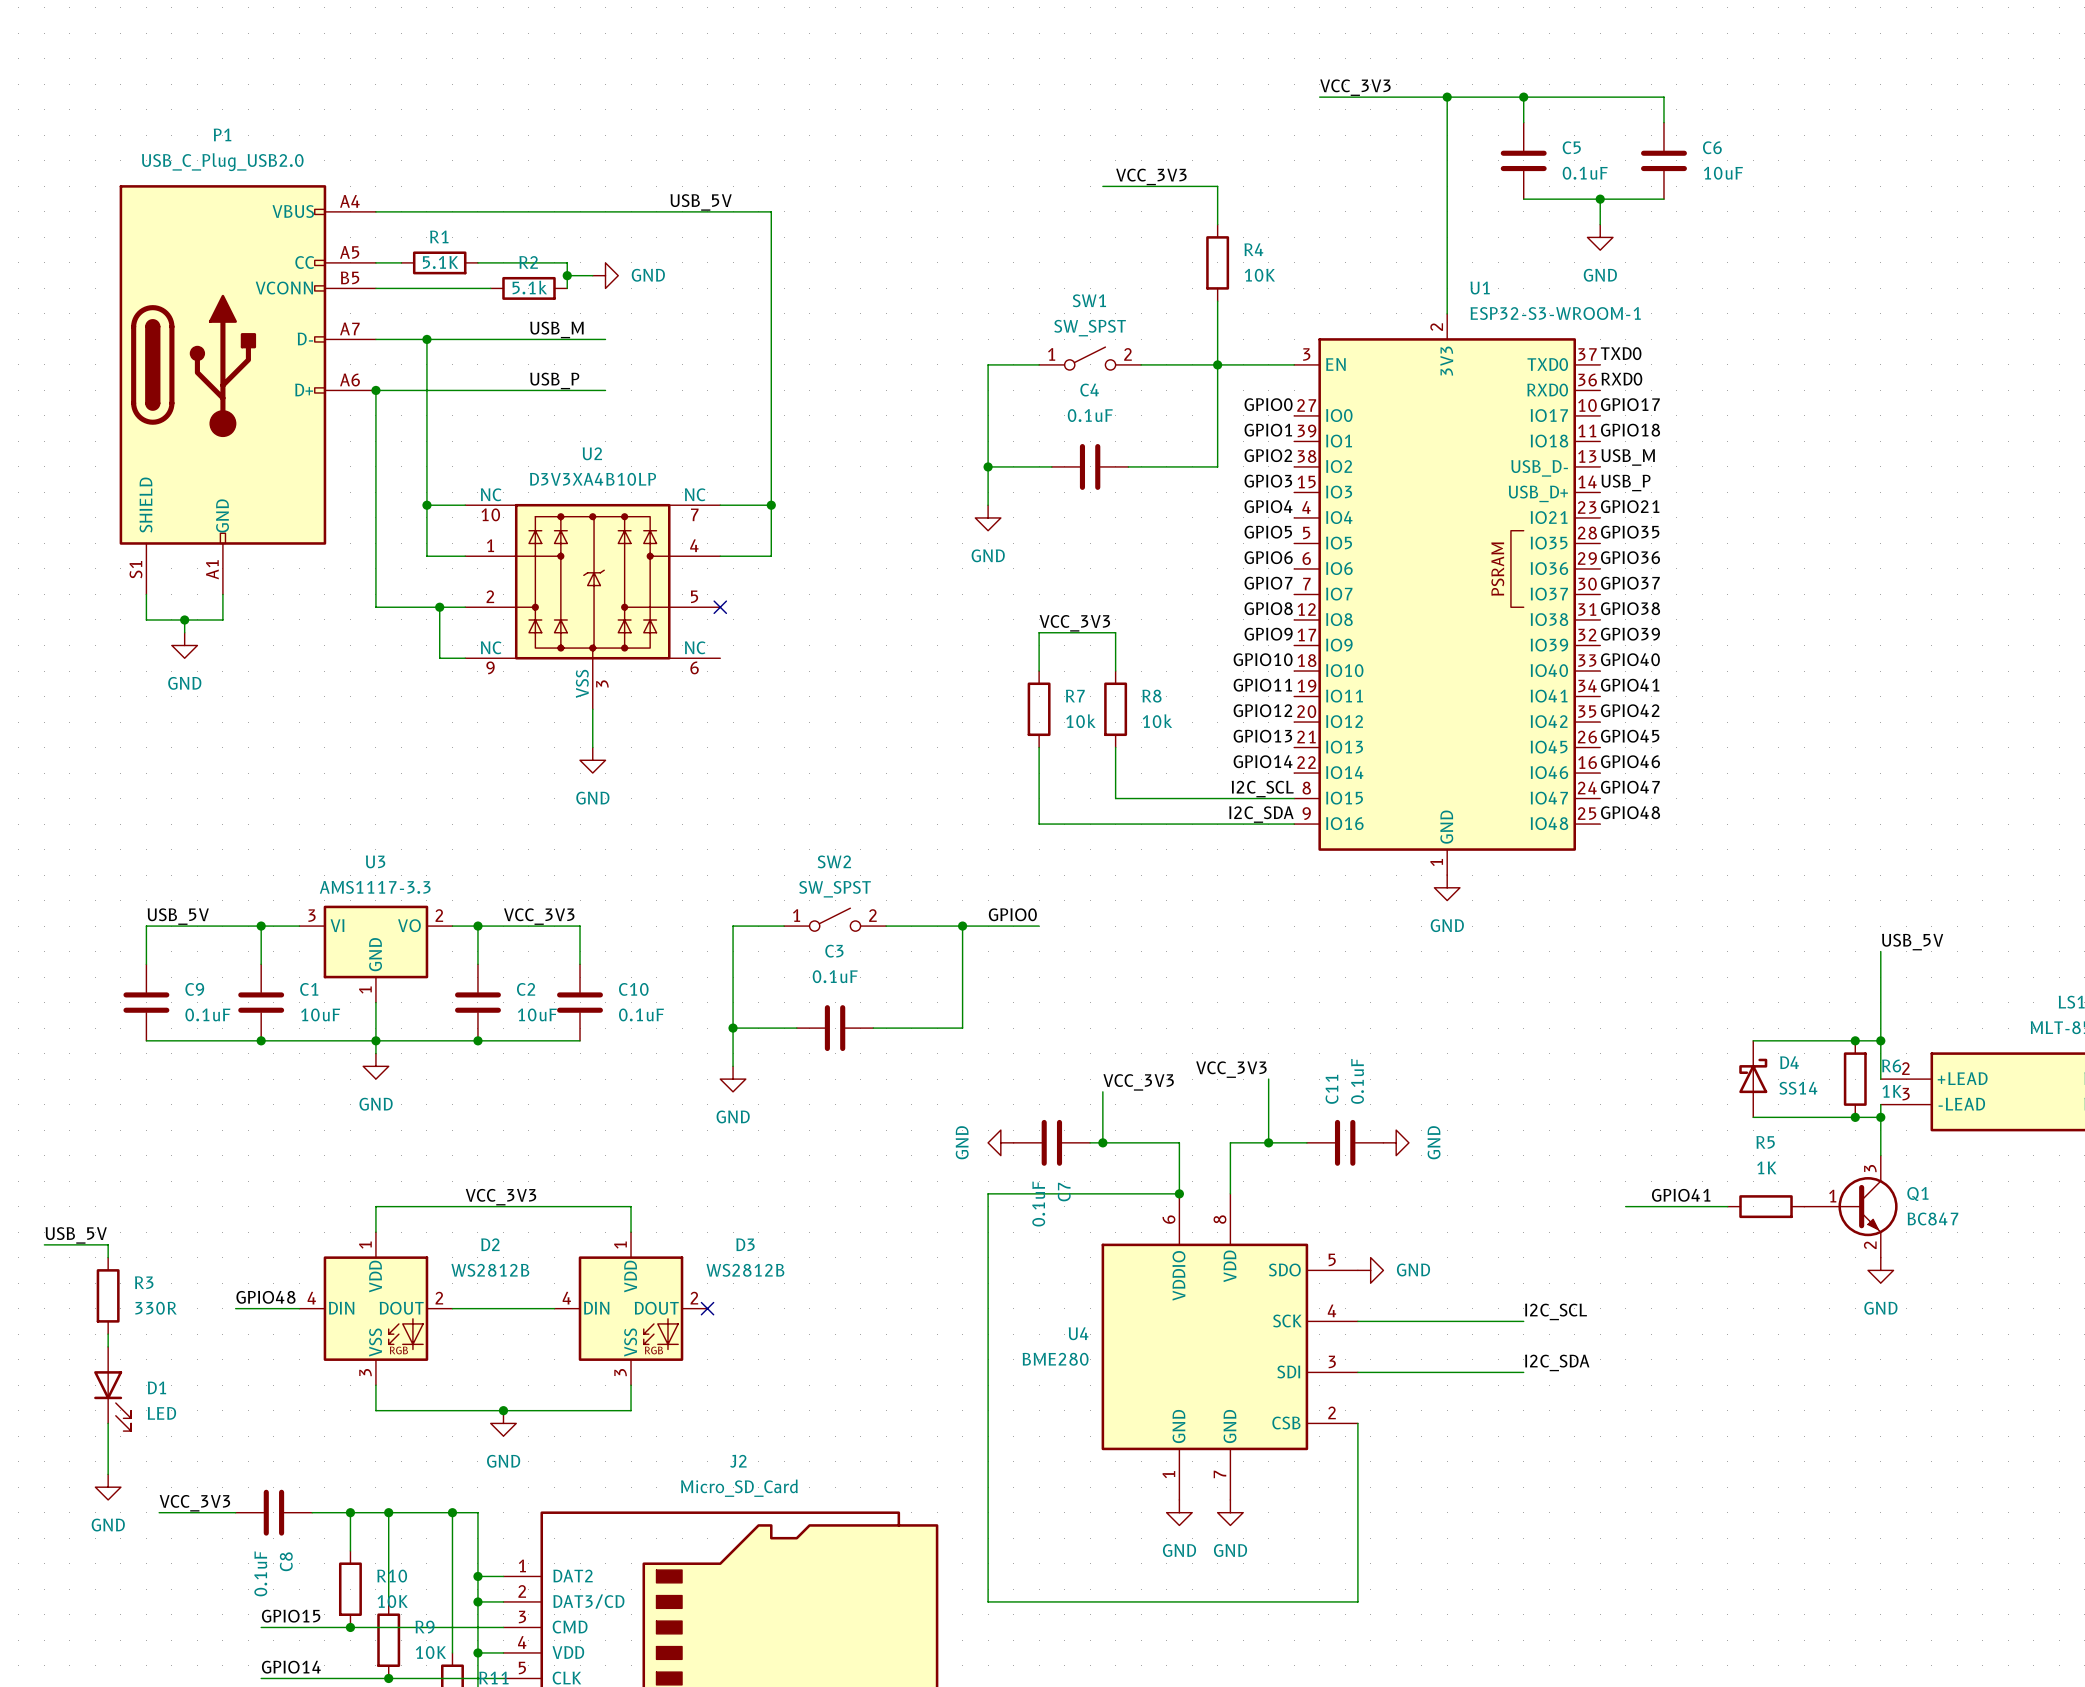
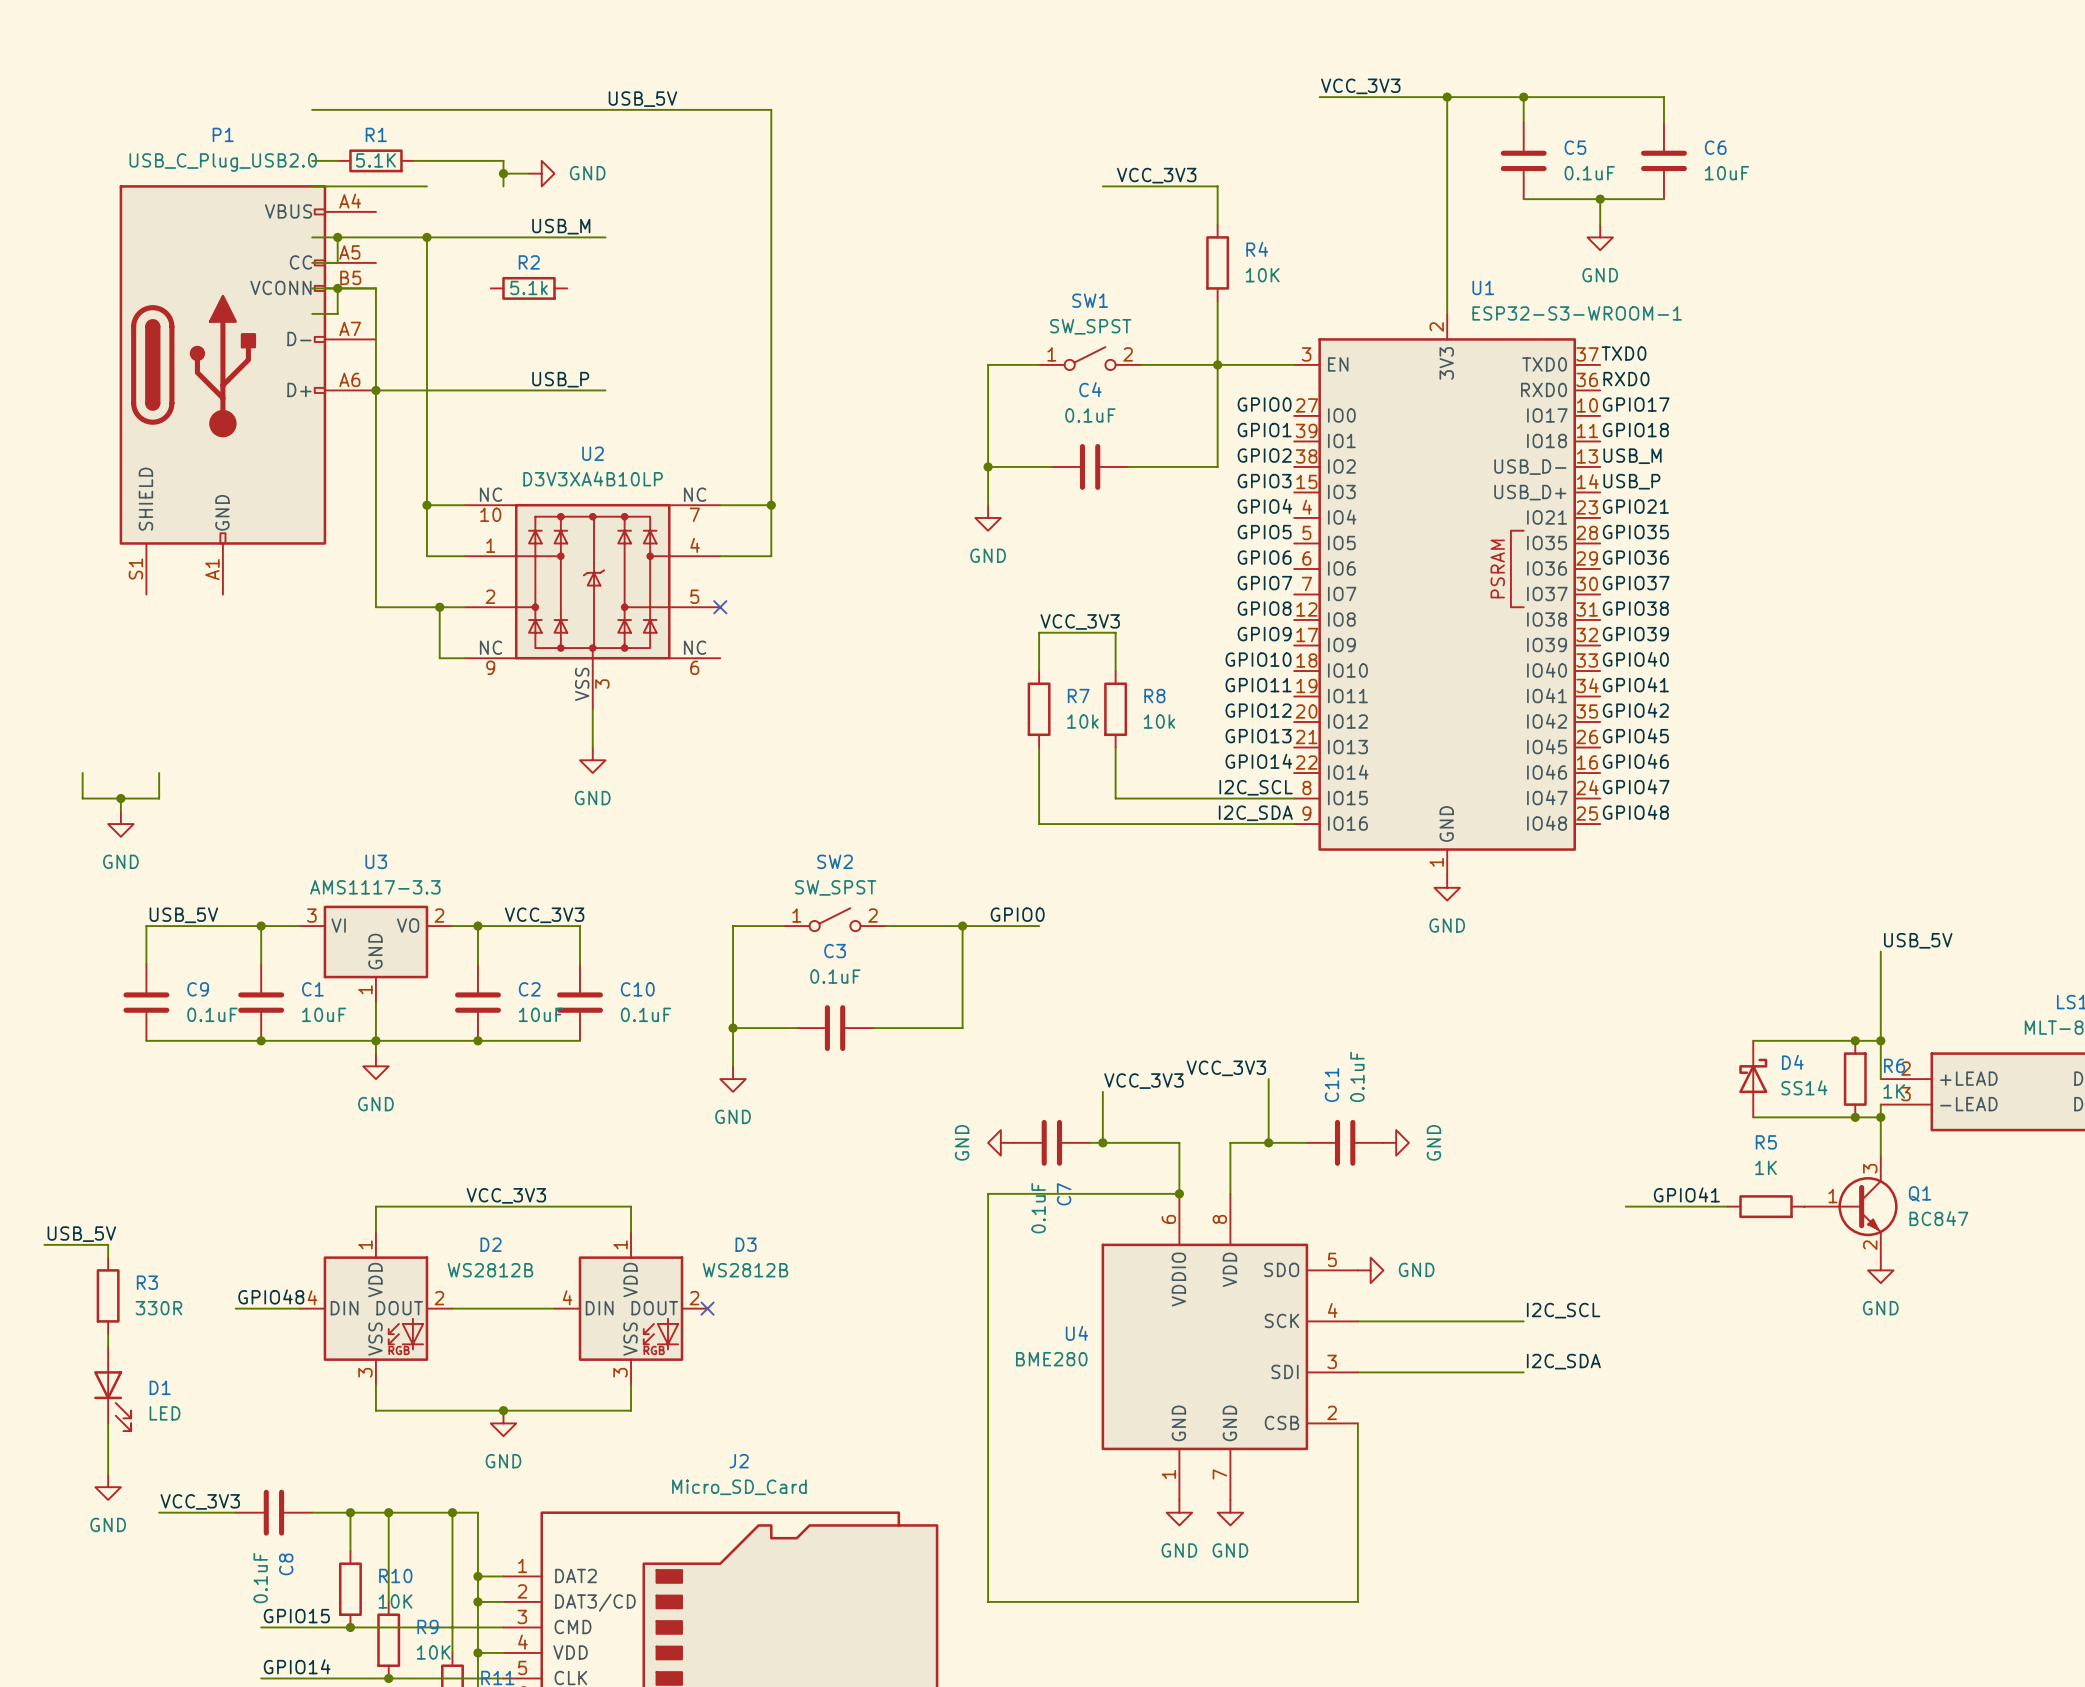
junction: none -> (503, 173)
label position: USB_5V (701, 202) -> USB_5V (642, 99)
wire: (375, 211) (771, 211) -> (312, 109) (771, 109) (771, 211)
wire: none -> (312, 237) (605, 237)
wire: none -> (337, 237) (337, 262) (312, 262)
junction: none -> (337, 237)
wire: none -> (426, 237) (426, 339)
junction: none -> (426, 237)
wire: (375, 262) (401, 262) -> (312, 160) (337, 160)
R1 position: (439, 262) -> (375, 160)
wire: (477, 262) (567, 262) (567, 288) -> (414, 160) (503, 160) (503, 186)
wire: (567, 275) (592, 275) -> (503, 173) (528, 173)
junction: (567, 275) -> none
power symbol position: GND (605, 275) -> GND (541, 173)
wire: none -> (312, 288) (375, 288) (375, 390)
wire: none -> (337, 288) (337, 313) (312, 313)
junction: none -> (337, 288)
wire: (375, 288) (490, 288) -> (312, 186) (426, 186)
label position: USB_M (556, 329) -> USB_M (561, 226)
wire: (375, 339) (605, 339) -> none
junction: (426, 339) -> none
wire: (146, 594) (146, 619) (222, 619) (222, 594) -> (82, 773) (82, 798) (159, 798) (159, 773)
wire: (184, 619) (184, 632) -> (120, 798) (120, 811)
junction: (184, 619) -> none
power symbol position: GND (184, 645) -> GND (120, 824)
junction: none -> (120, 798)

